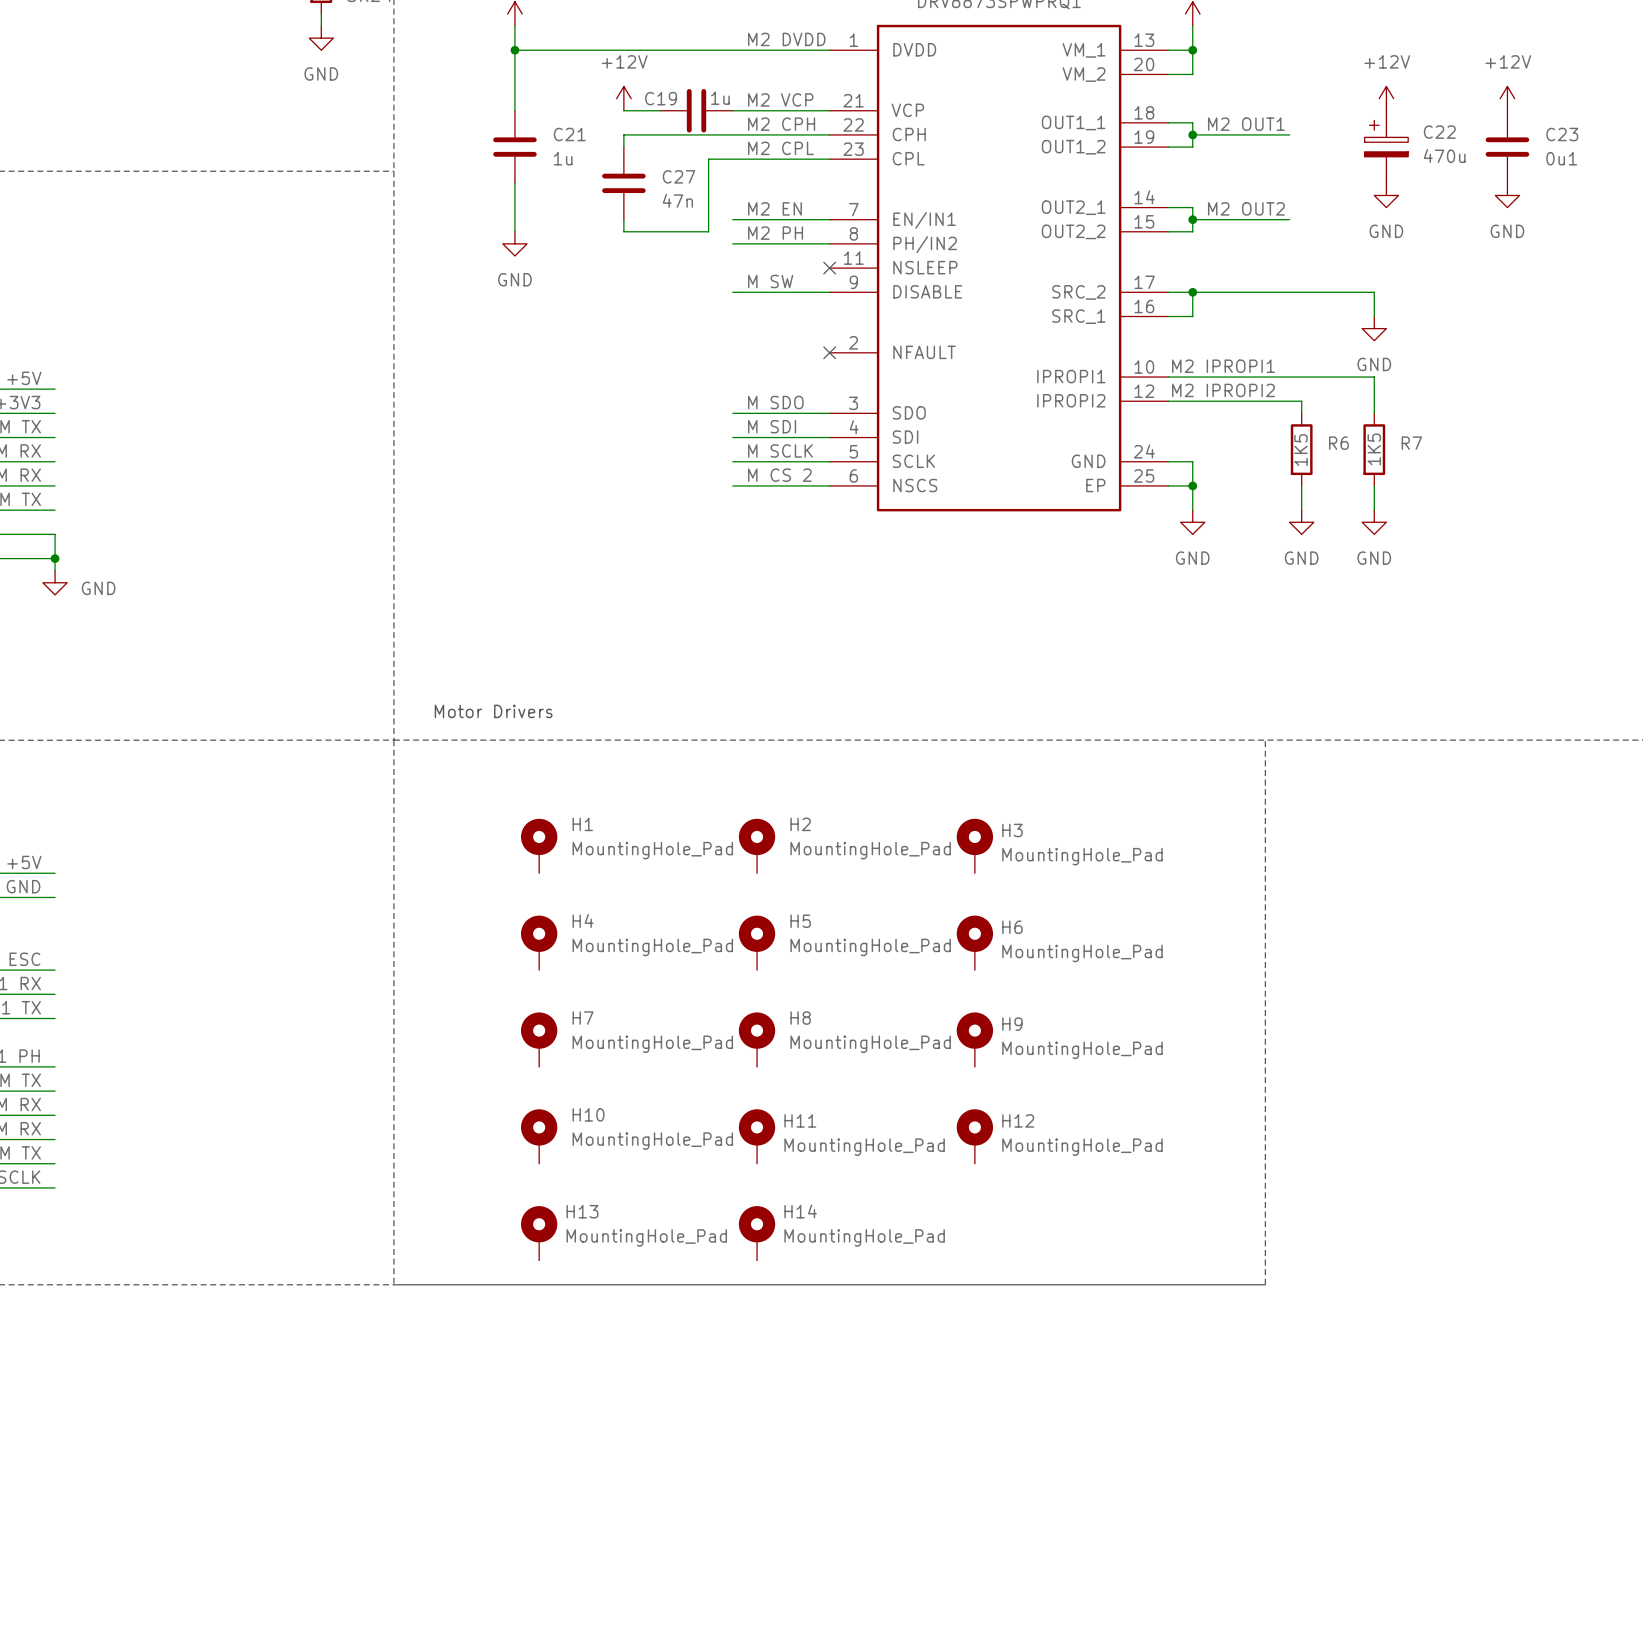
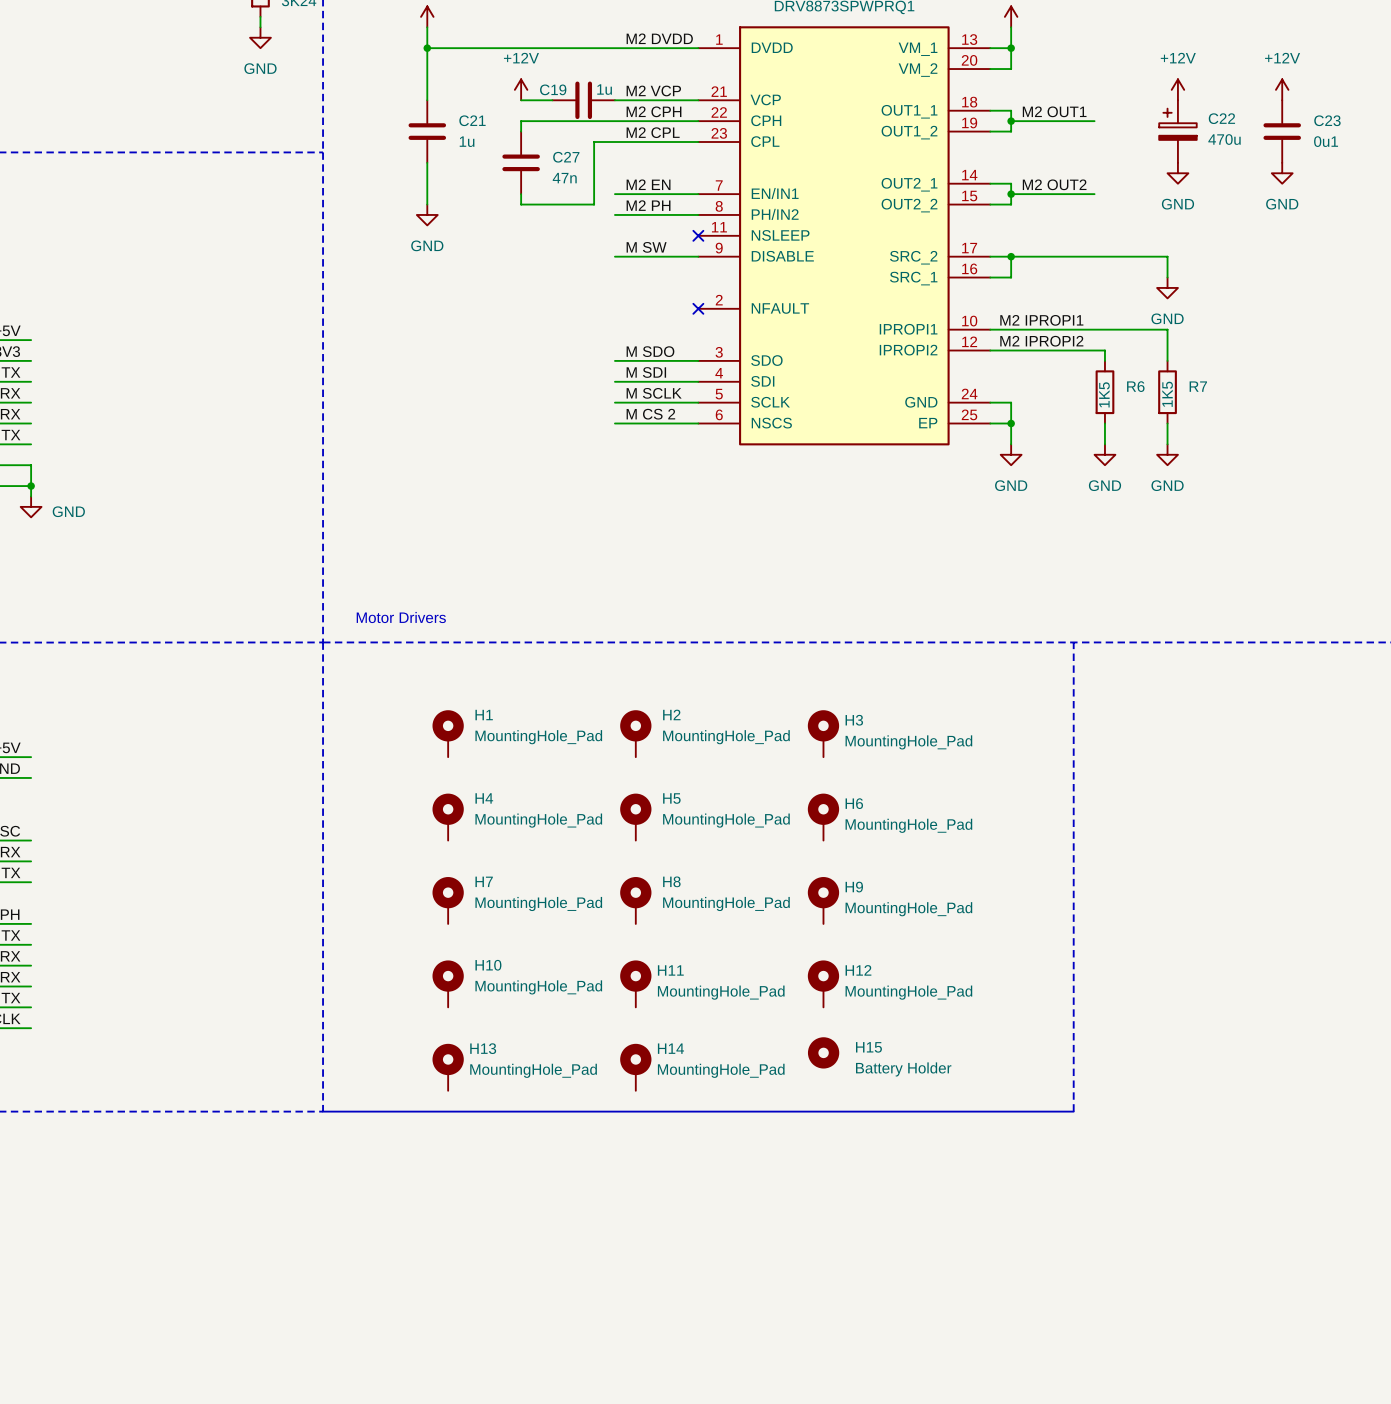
H15: none -> Battery Holder (823, 1052)

